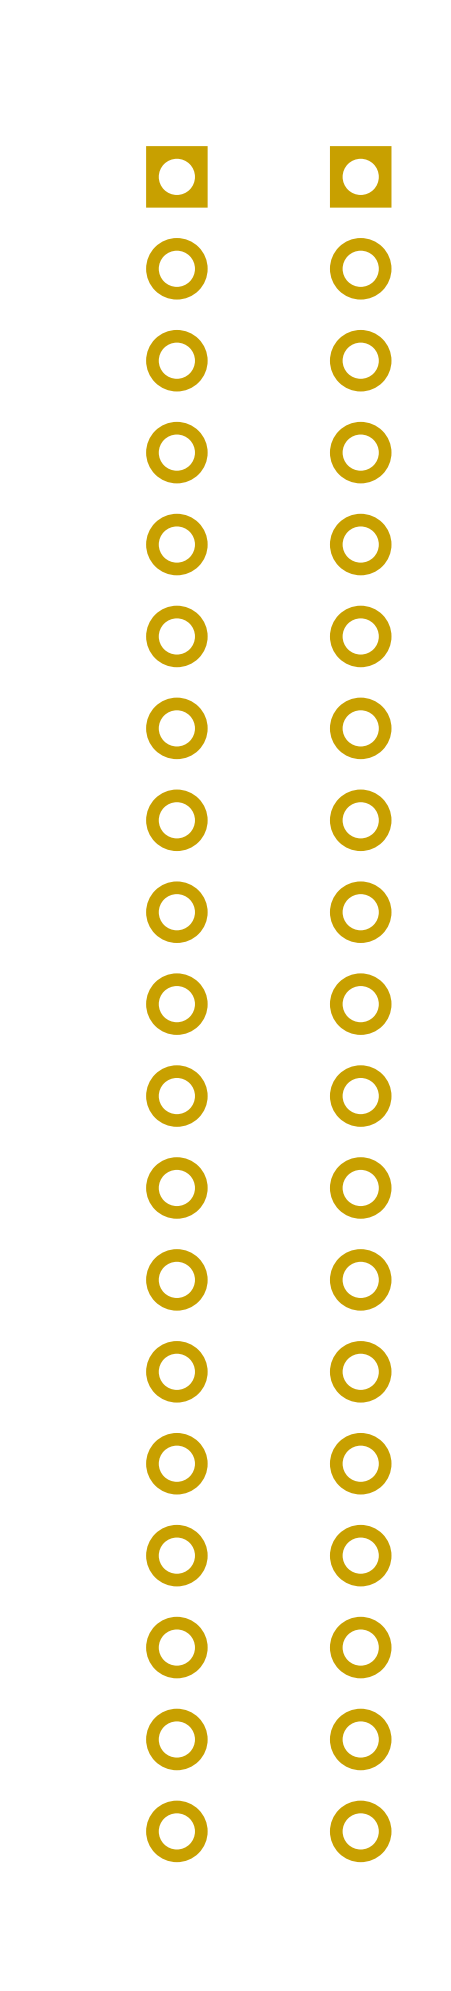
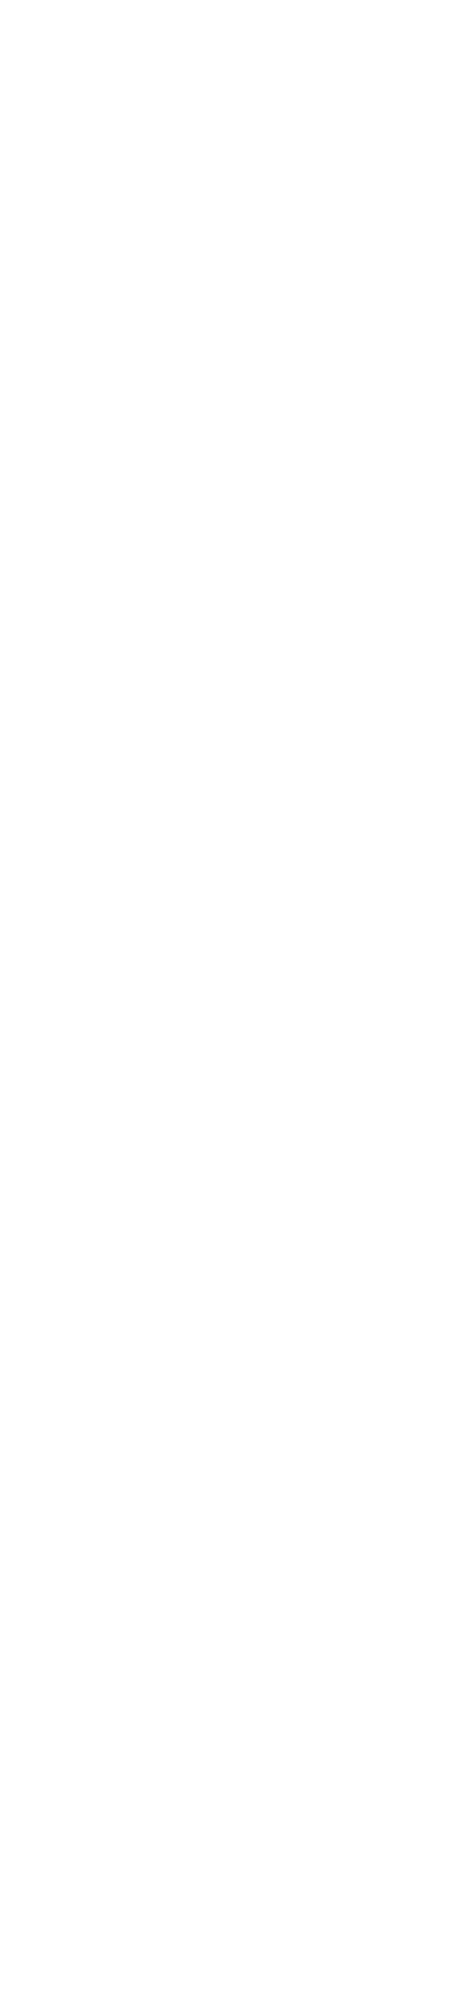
part: (176, 1004) -> none
part: (360, 1004) -> none

